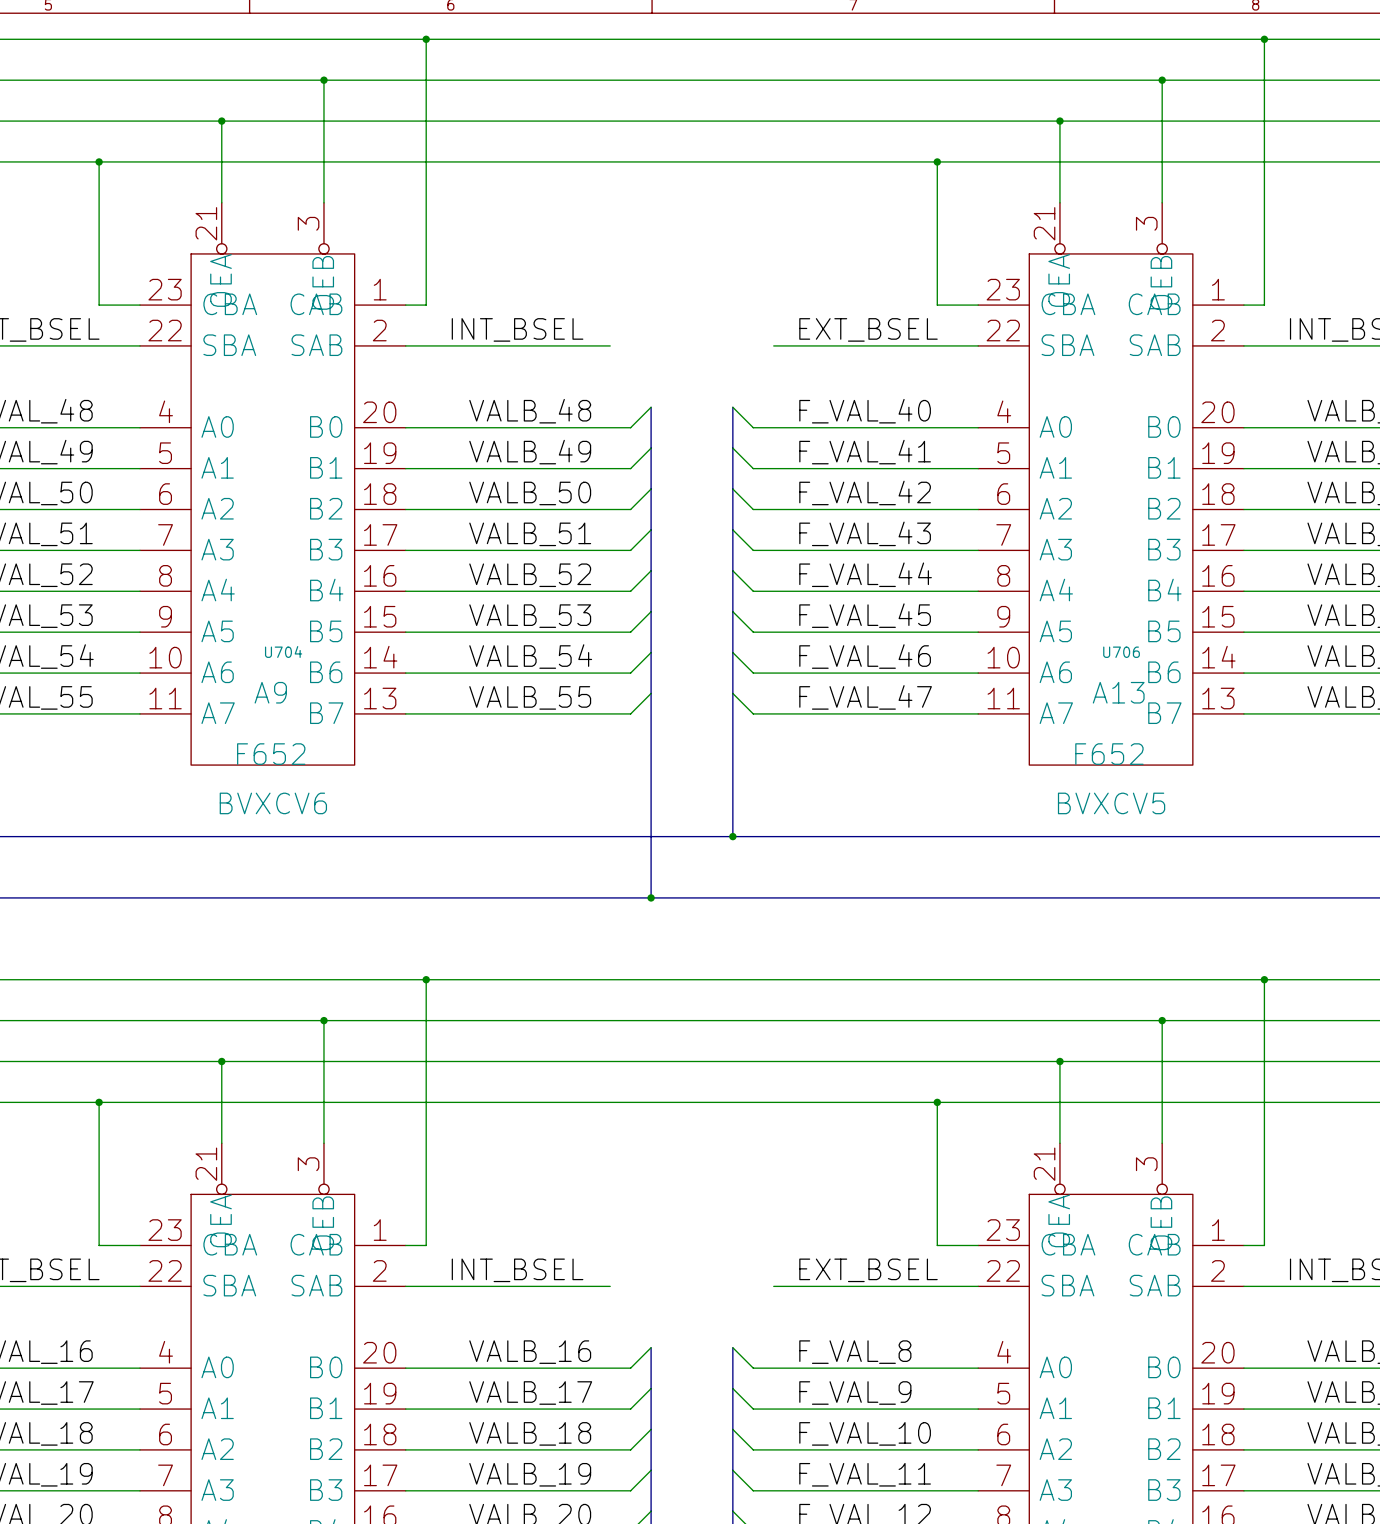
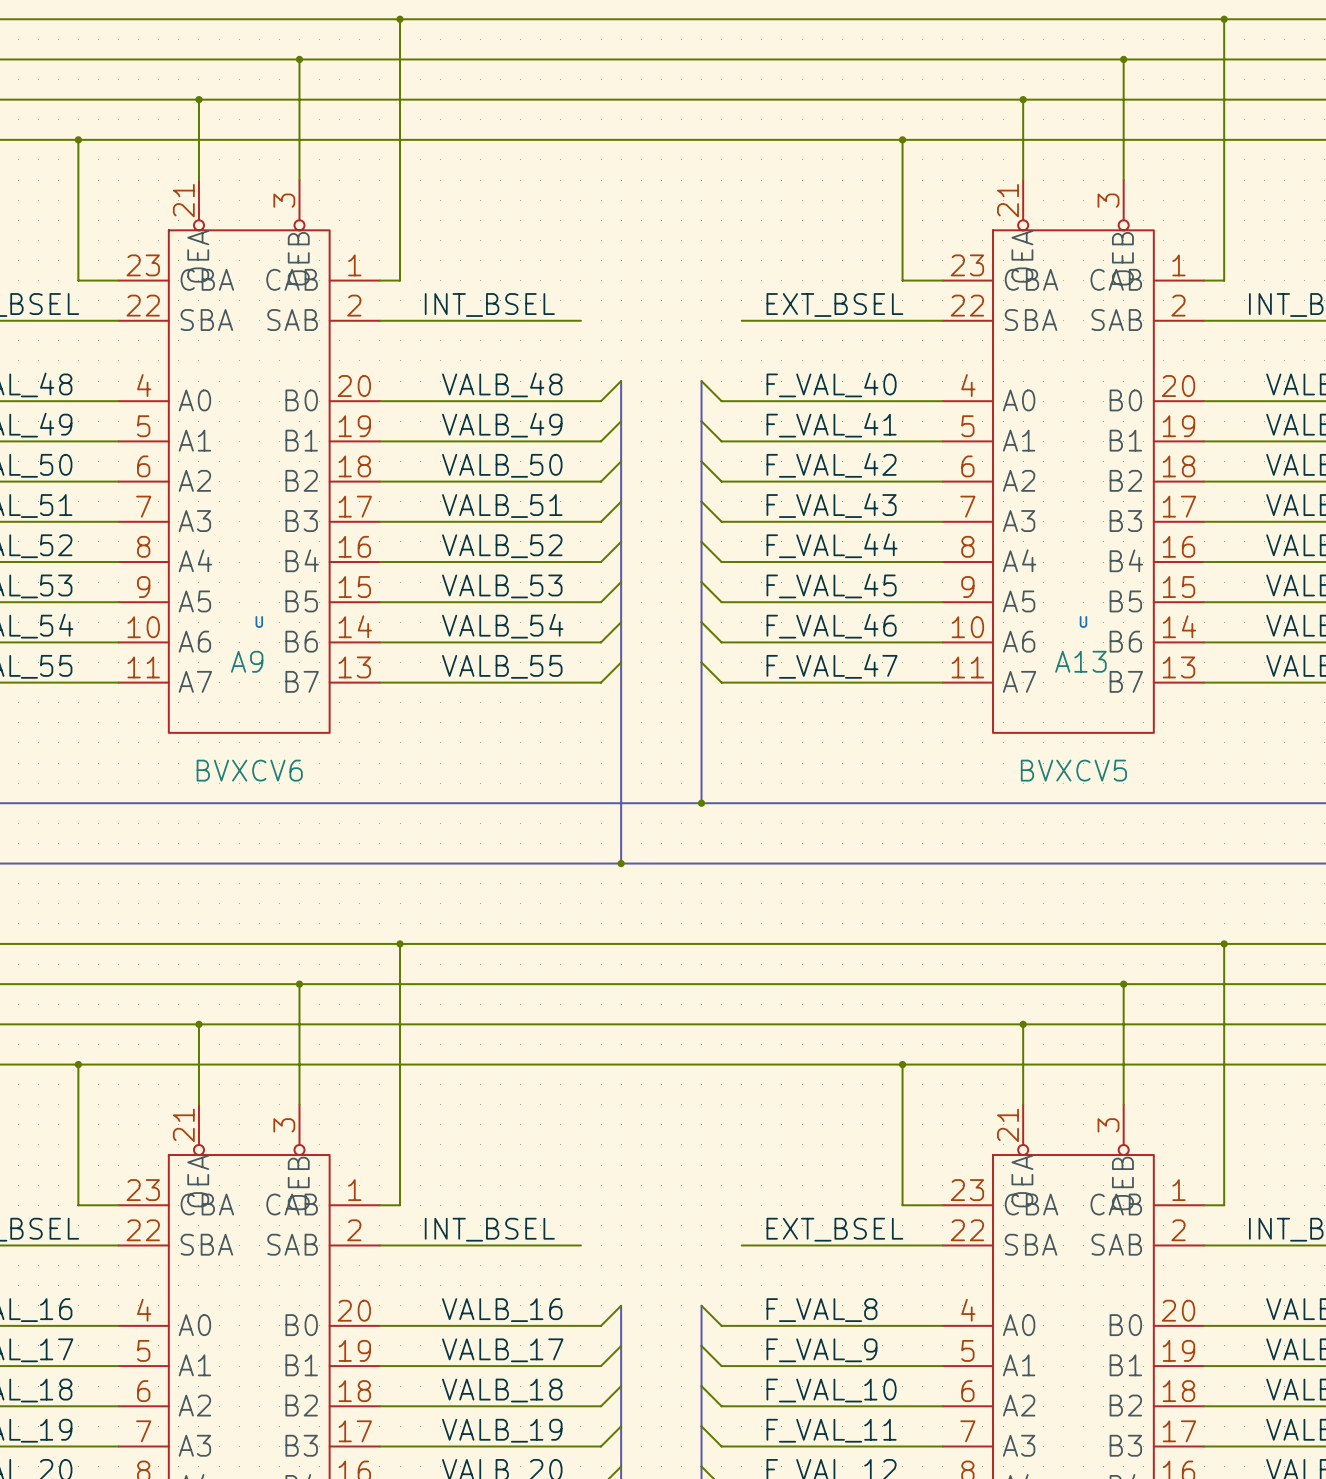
U704 name: U704 (283, 651) -> U (259, 621)
U706 name: U706 (1121, 652) -> U (1083, 621)
U704 value: F652 (271, 754) -> none
U706 value: F652 (1109, 754) -> none

